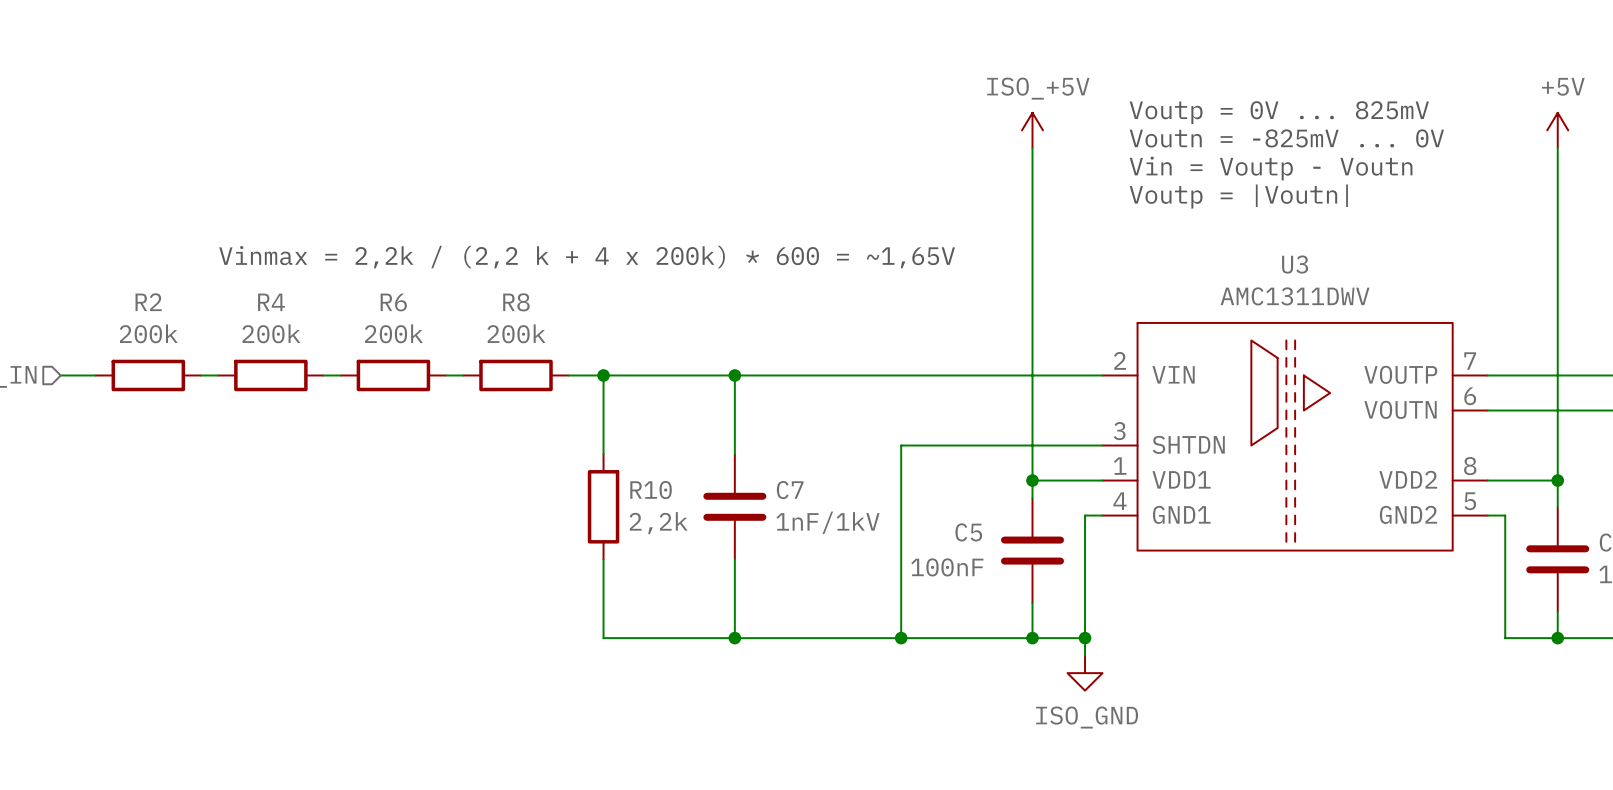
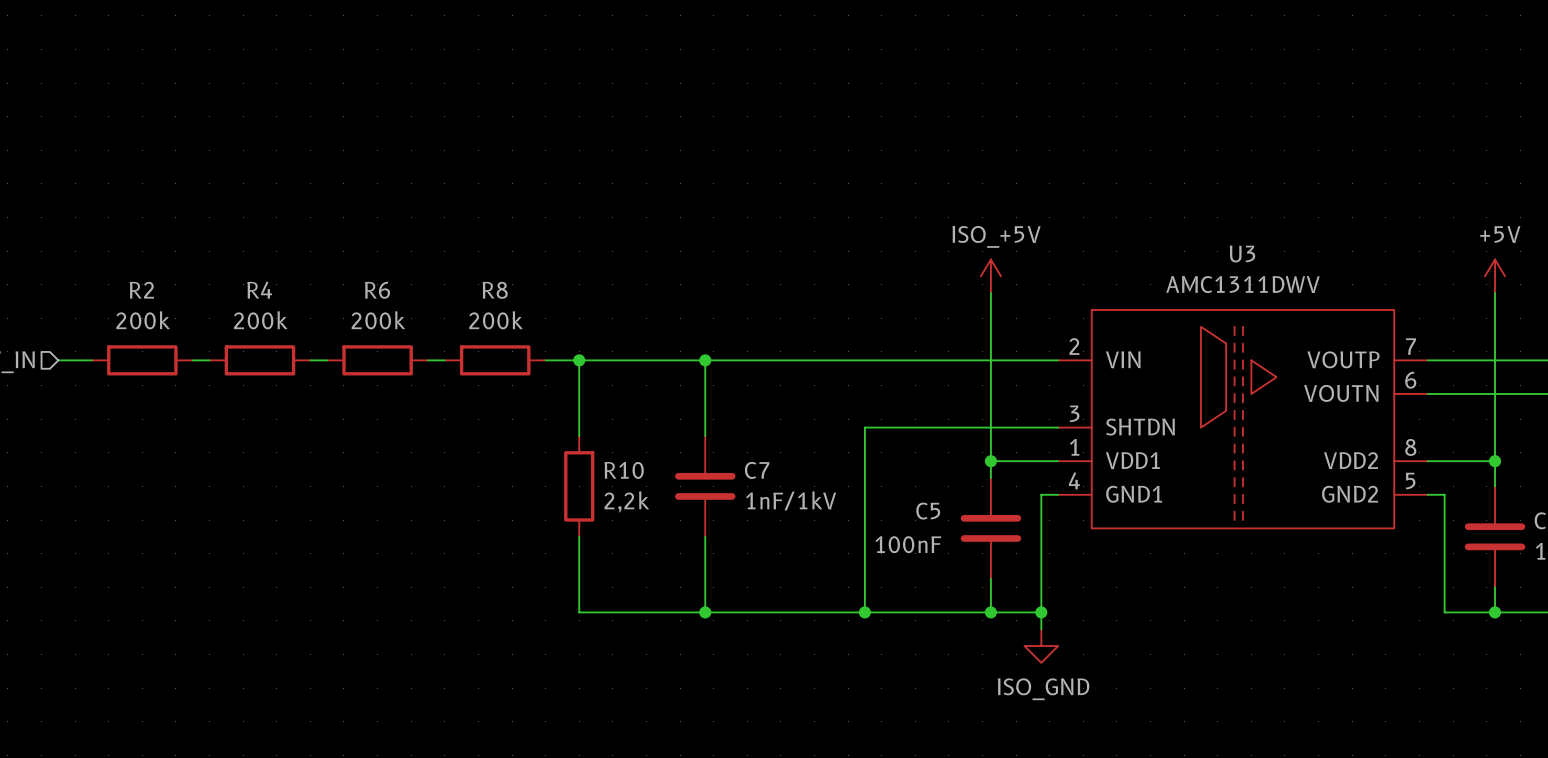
text: Voutp = 0V ... 825mV (1279, 112) -> none
power symbol position: ISO_+5V (1032, 130) -> ISO_+5V (990, 276)
power symbol position: +5V (1557, 130) -> +5V (1495, 276)
text: Voutn = -825mV ... 0V (1286, 138) -> none
wire: (1032, 147) (1032, 305) -> none
wire: (1557, 147) (1557, 305) -> none
text: Vin = Voutp - Voutn (1271, 168) -> none
text: Voutp = |Voutn| (1238, 196) -> none
text: Vinmax = 2,2k / (2,2 k + 4 x 200k) * 600 = ~1,65V (587, 257) -> none

